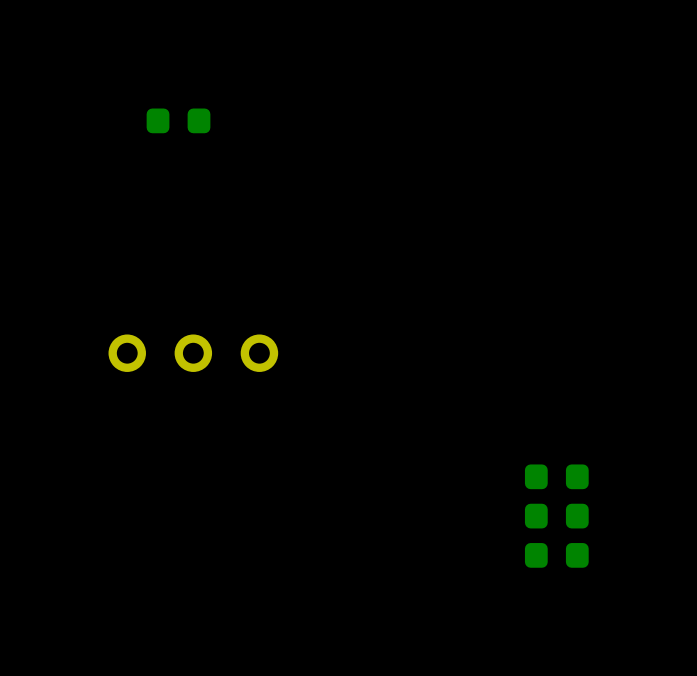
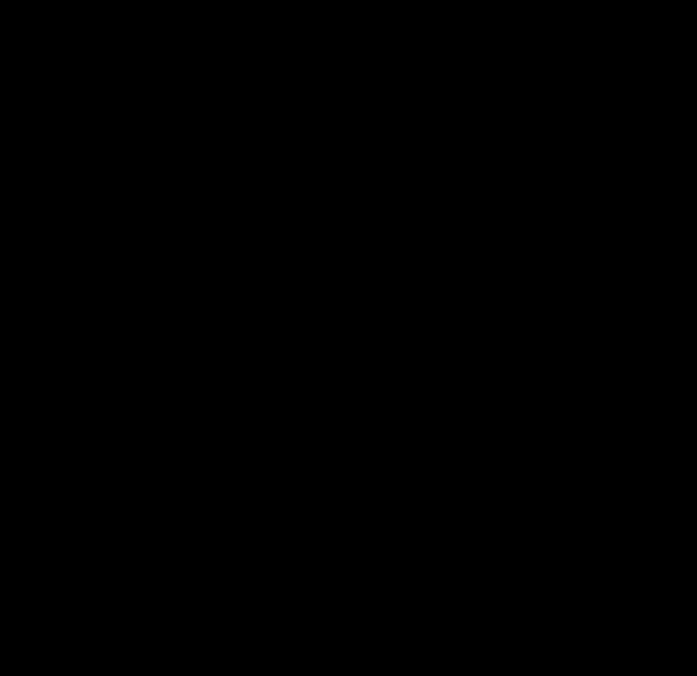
part: (178, 120) -> none
part: (193, 353) -> none
part: (556, 476) -> none
part: (556, 516) -> none
part: (556, 555) -> none

